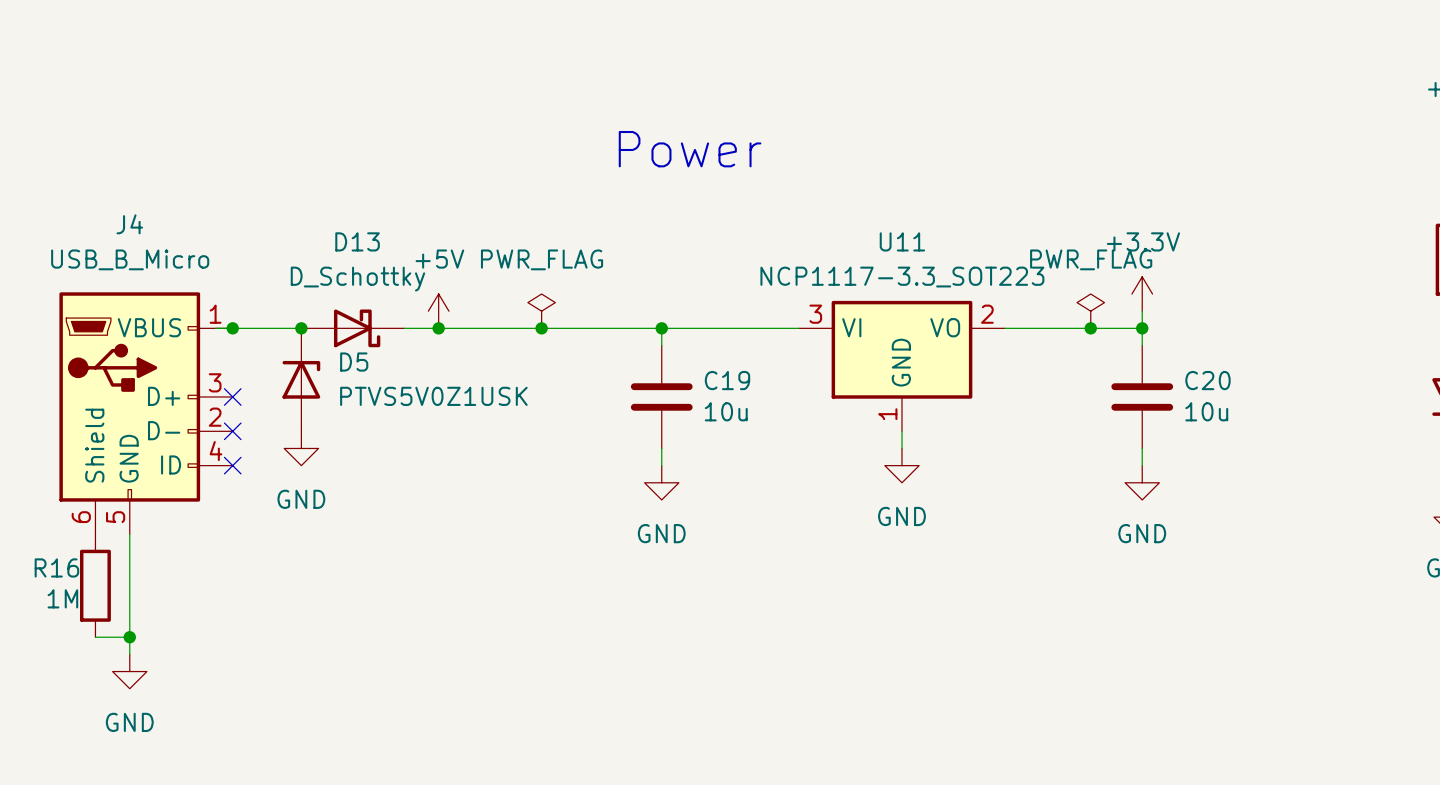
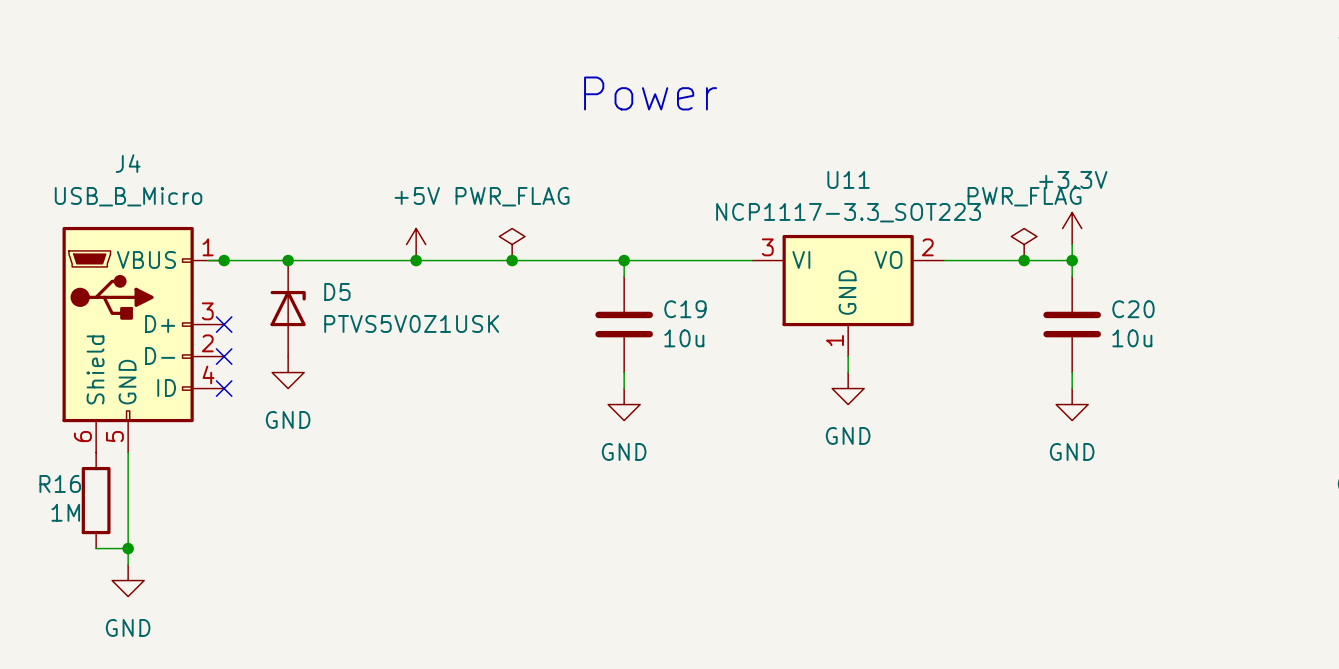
D13: D_Schottky (352, 328) -> none

